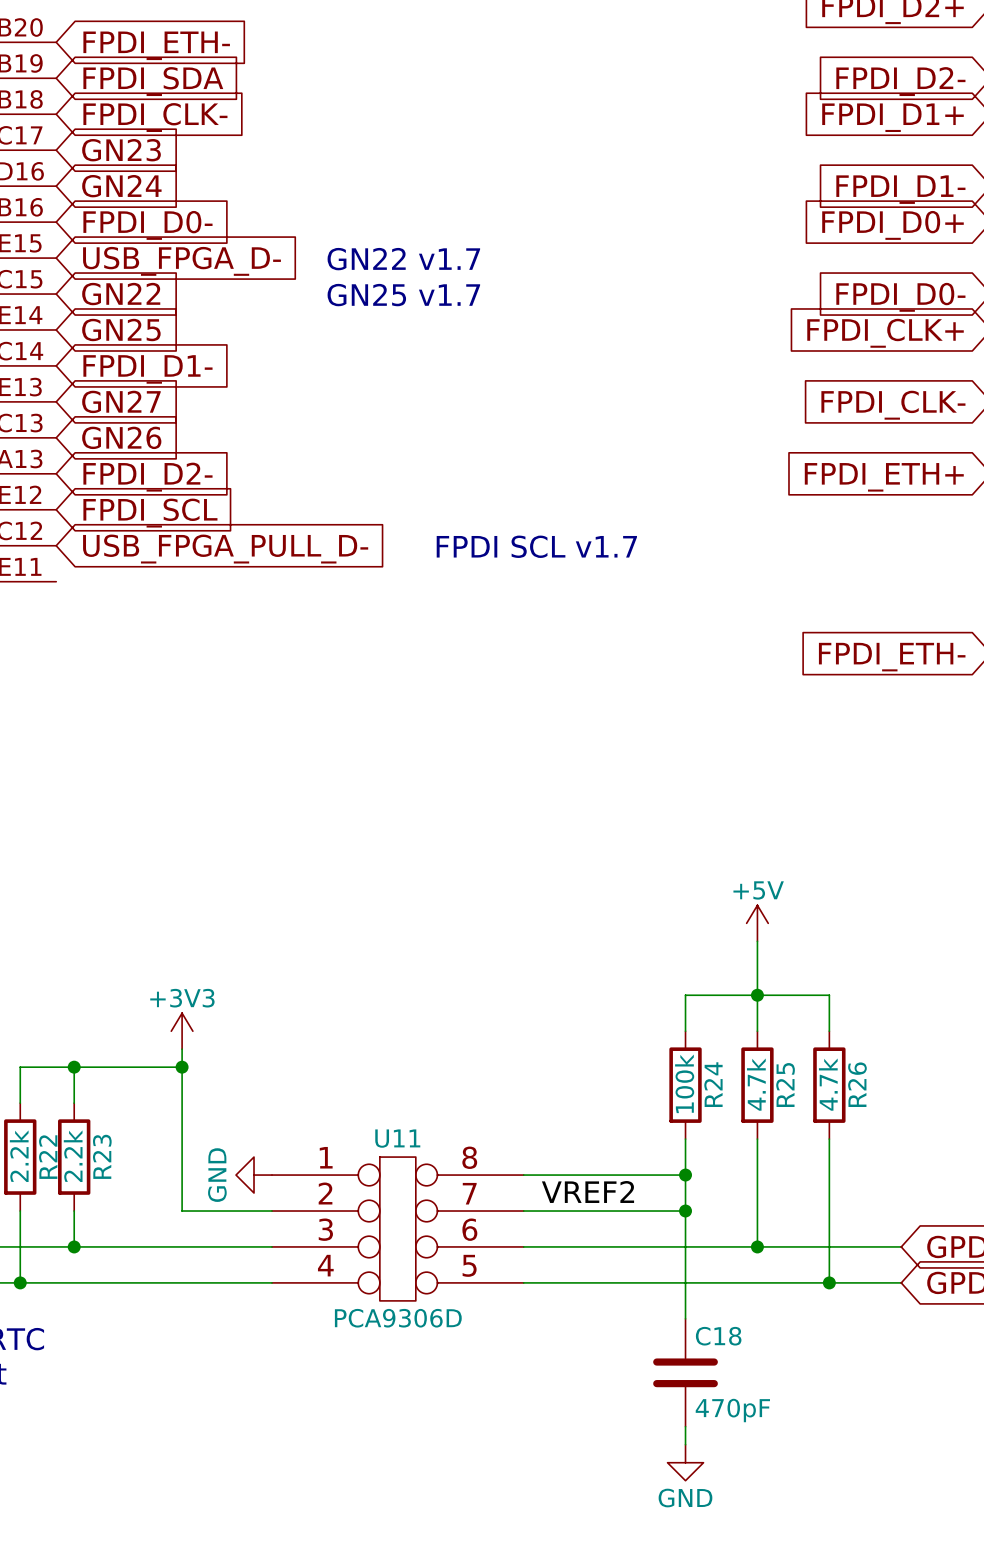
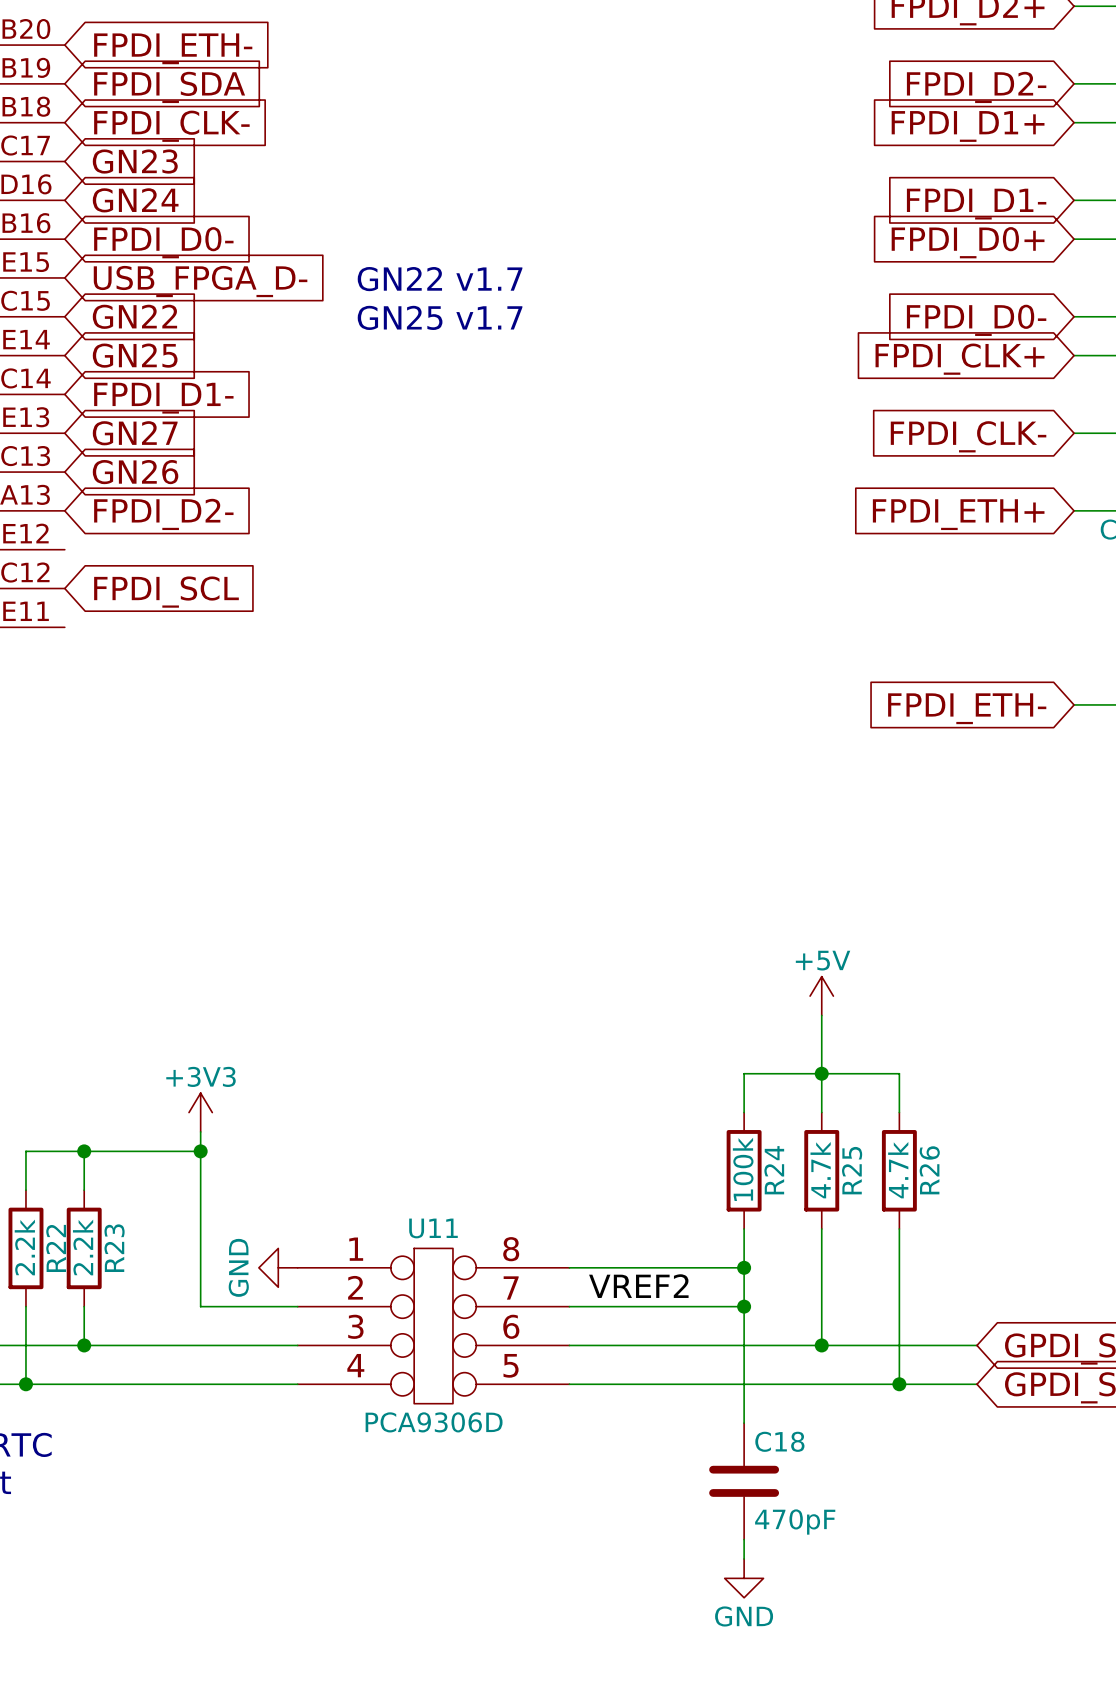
global label: FPDI_SCL (150, 513) -> none
text: FPDI SCL v1.7 (536, 546) -> none
global label: USB_FPGA_PULL_D- (225, 549) -> FPDI_SCL (166, 592)

